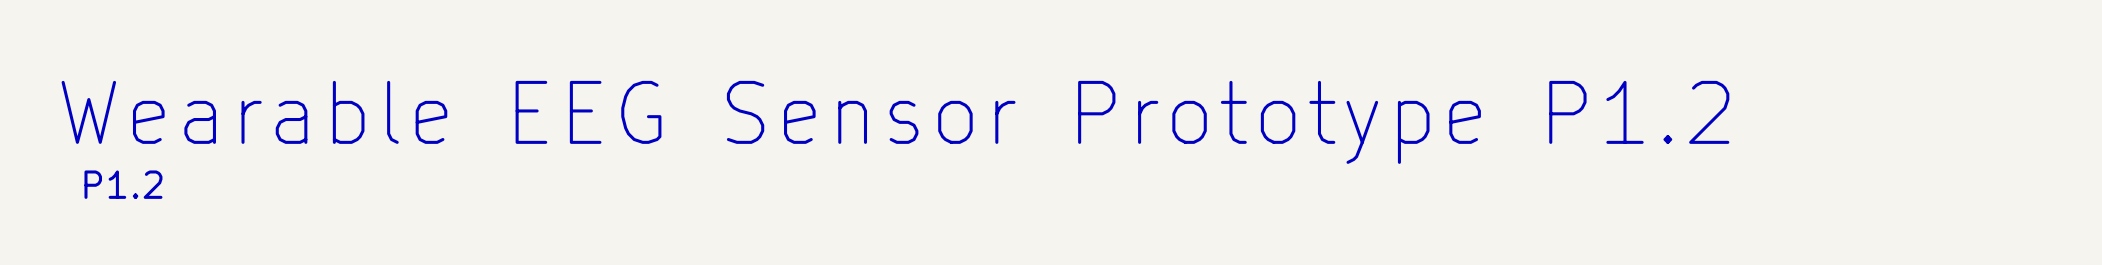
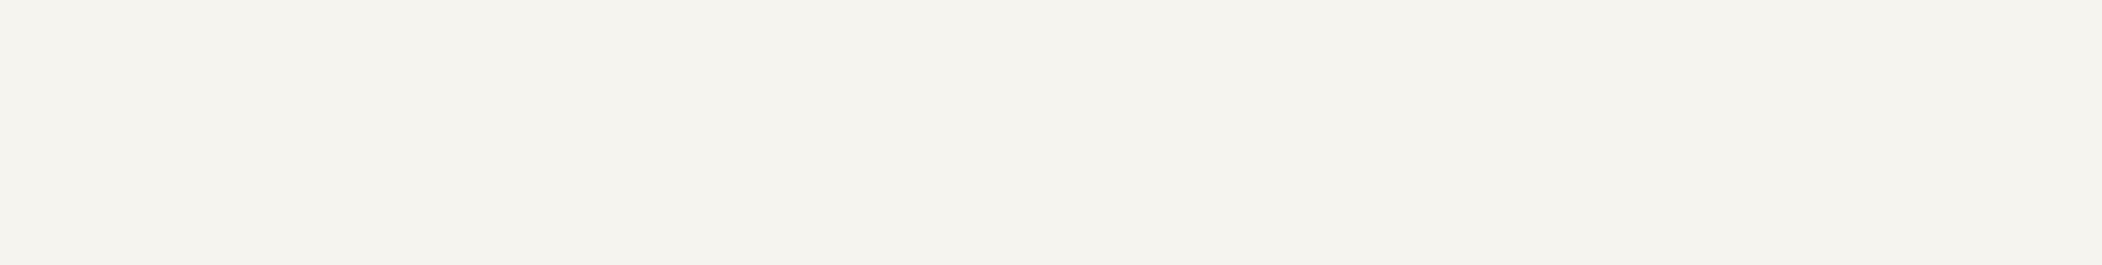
text: Wearable EEG Sensor Prototype P1.2 (895, 122) -> none
text: P1.2 (123, 184) -> none

